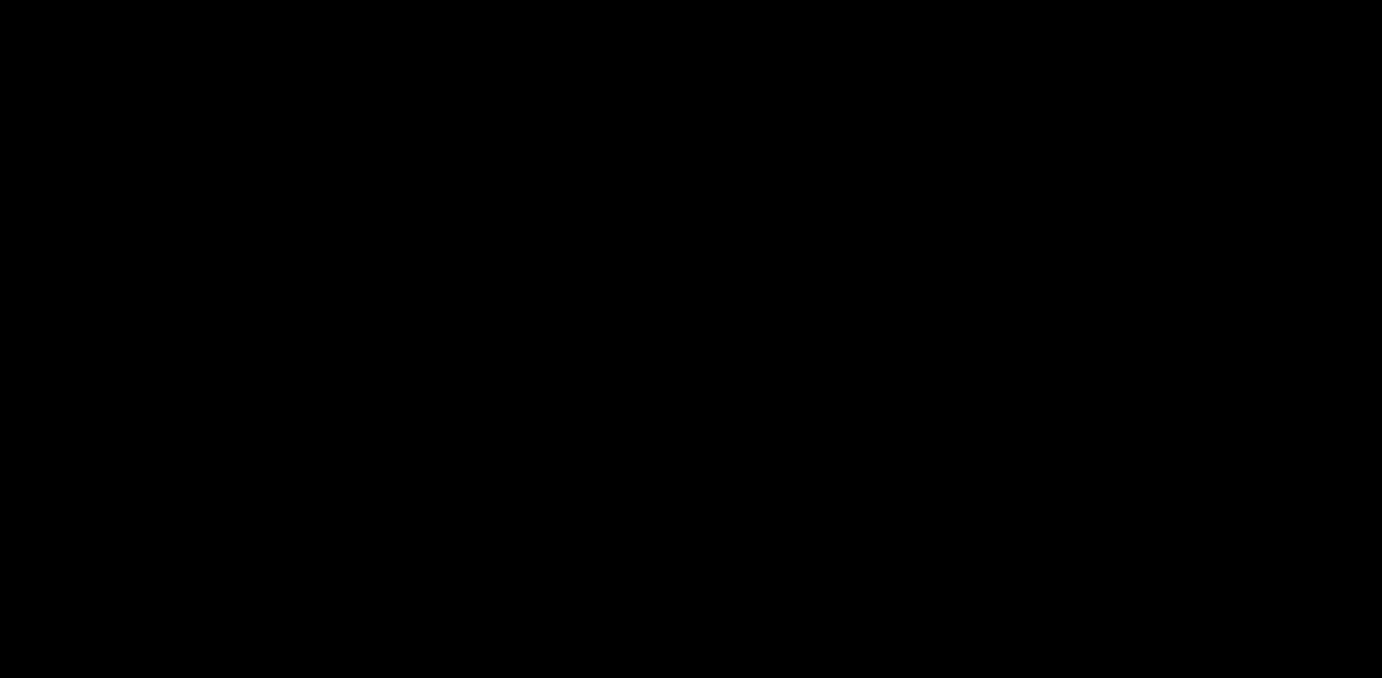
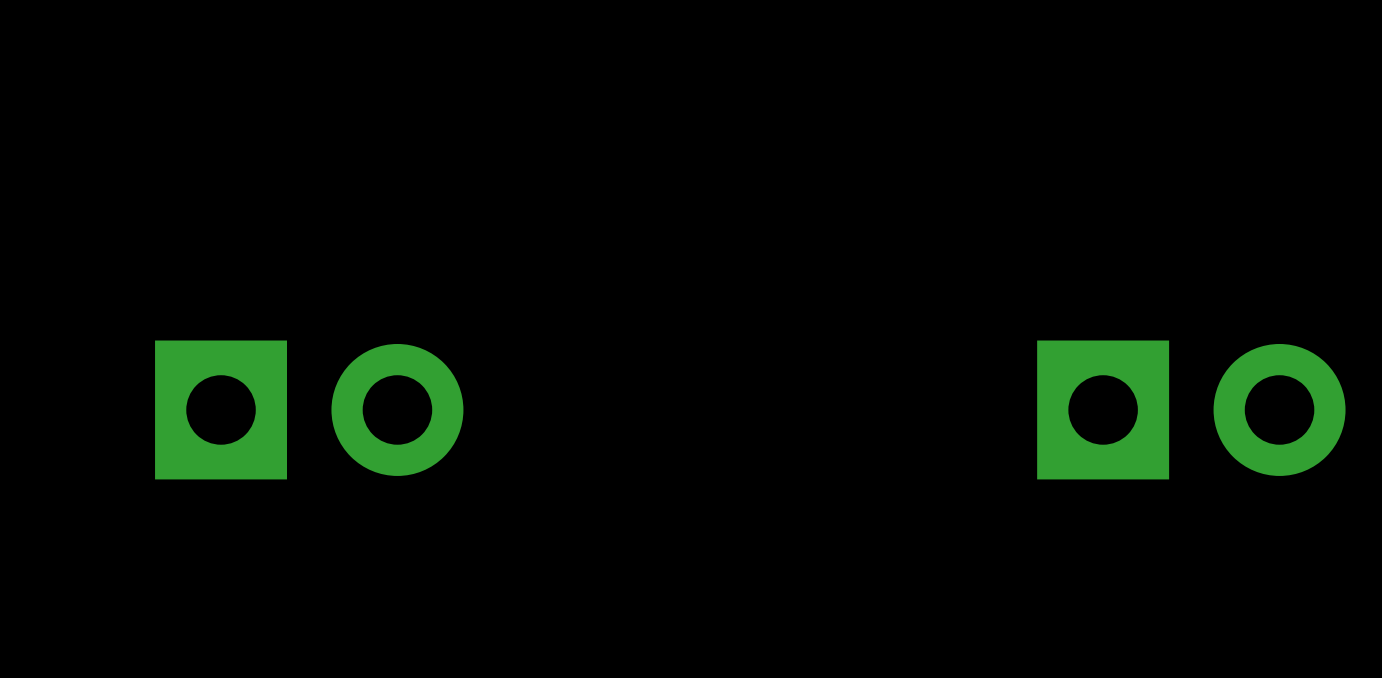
part: none -> (309, 409)
part: none -> (1191, 409)

